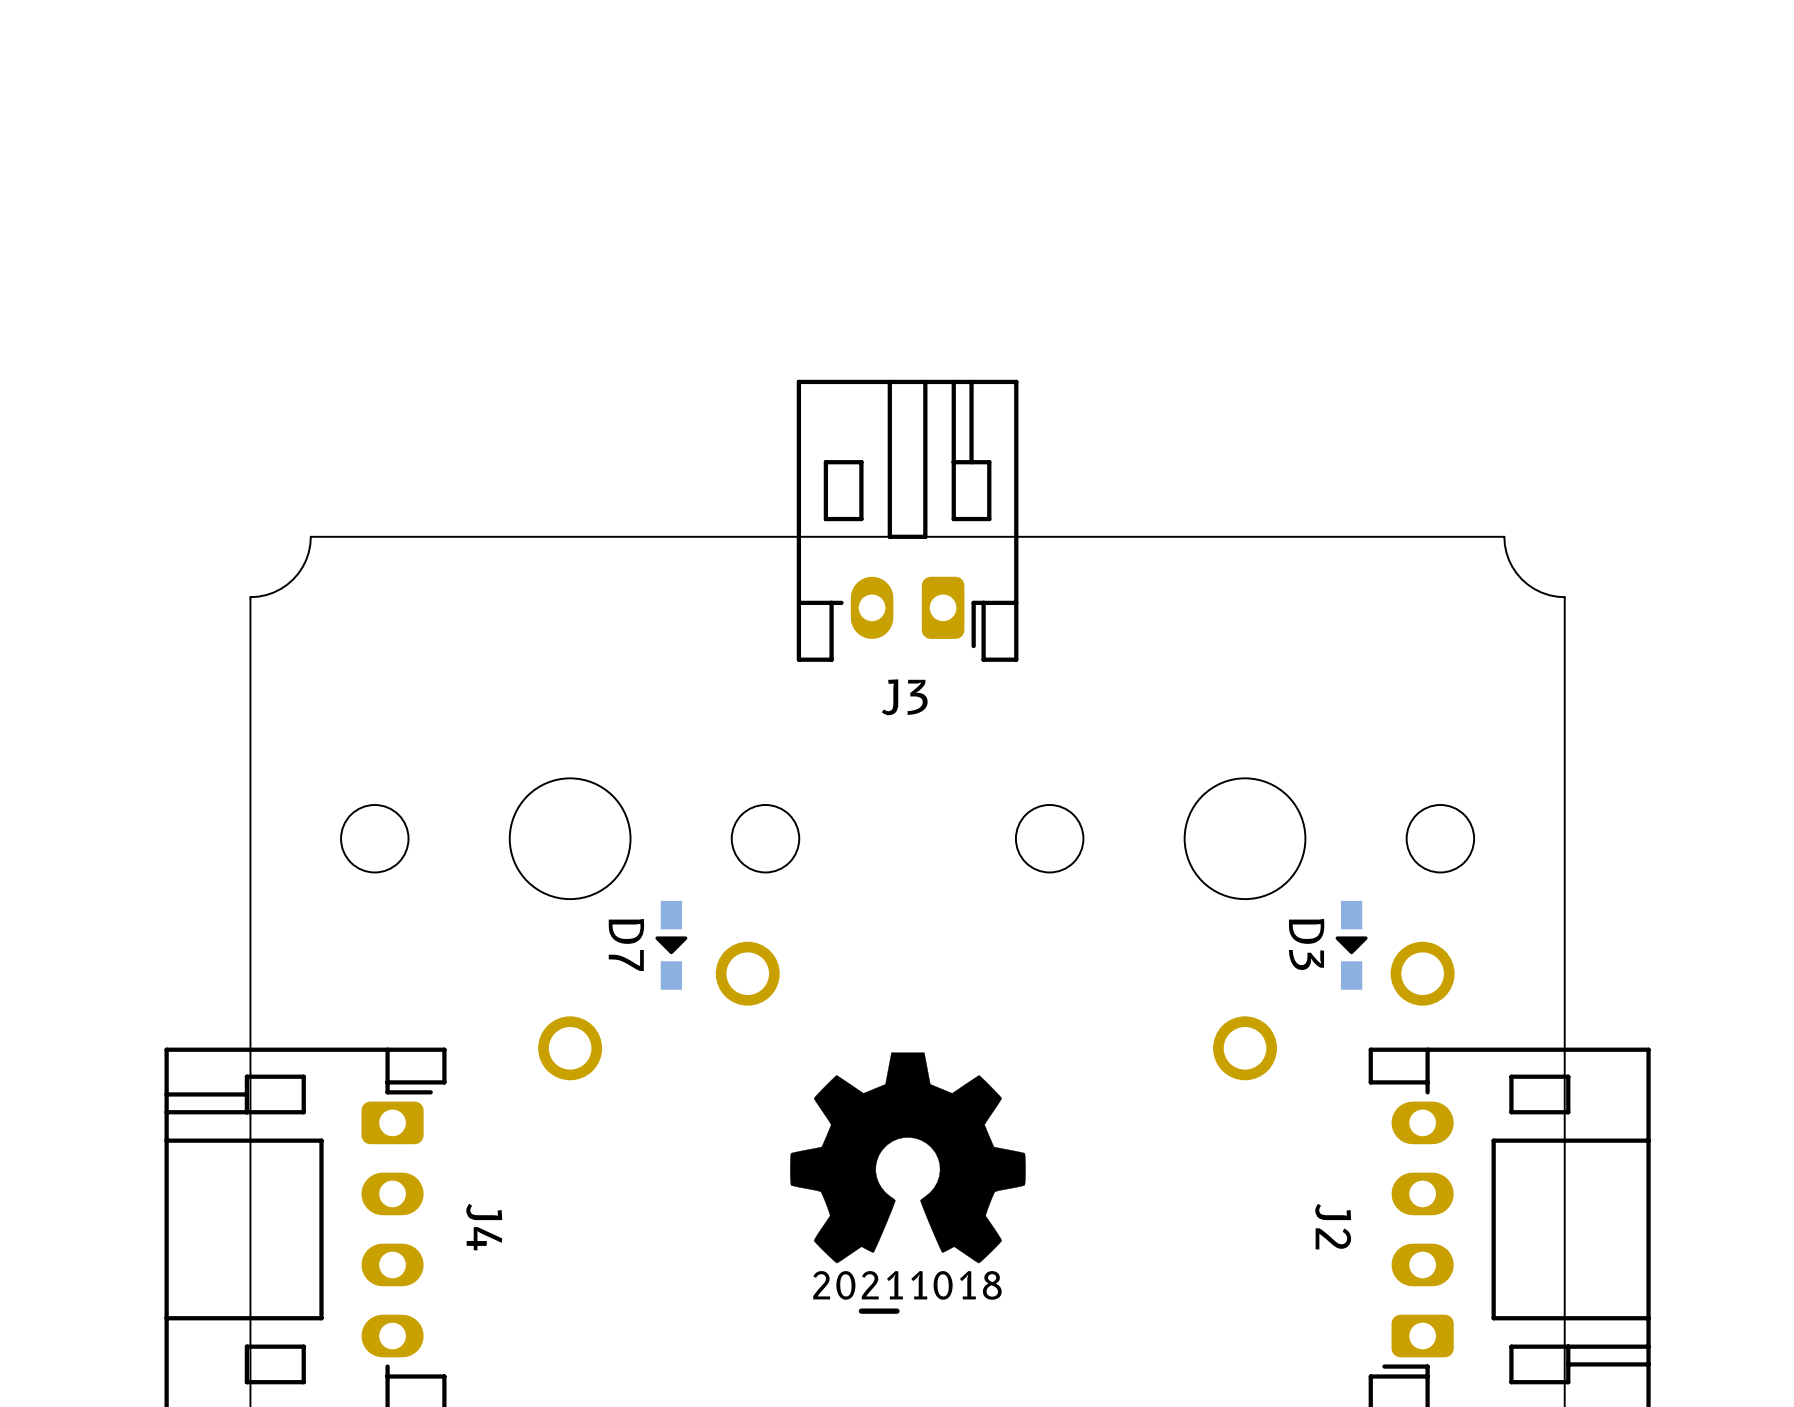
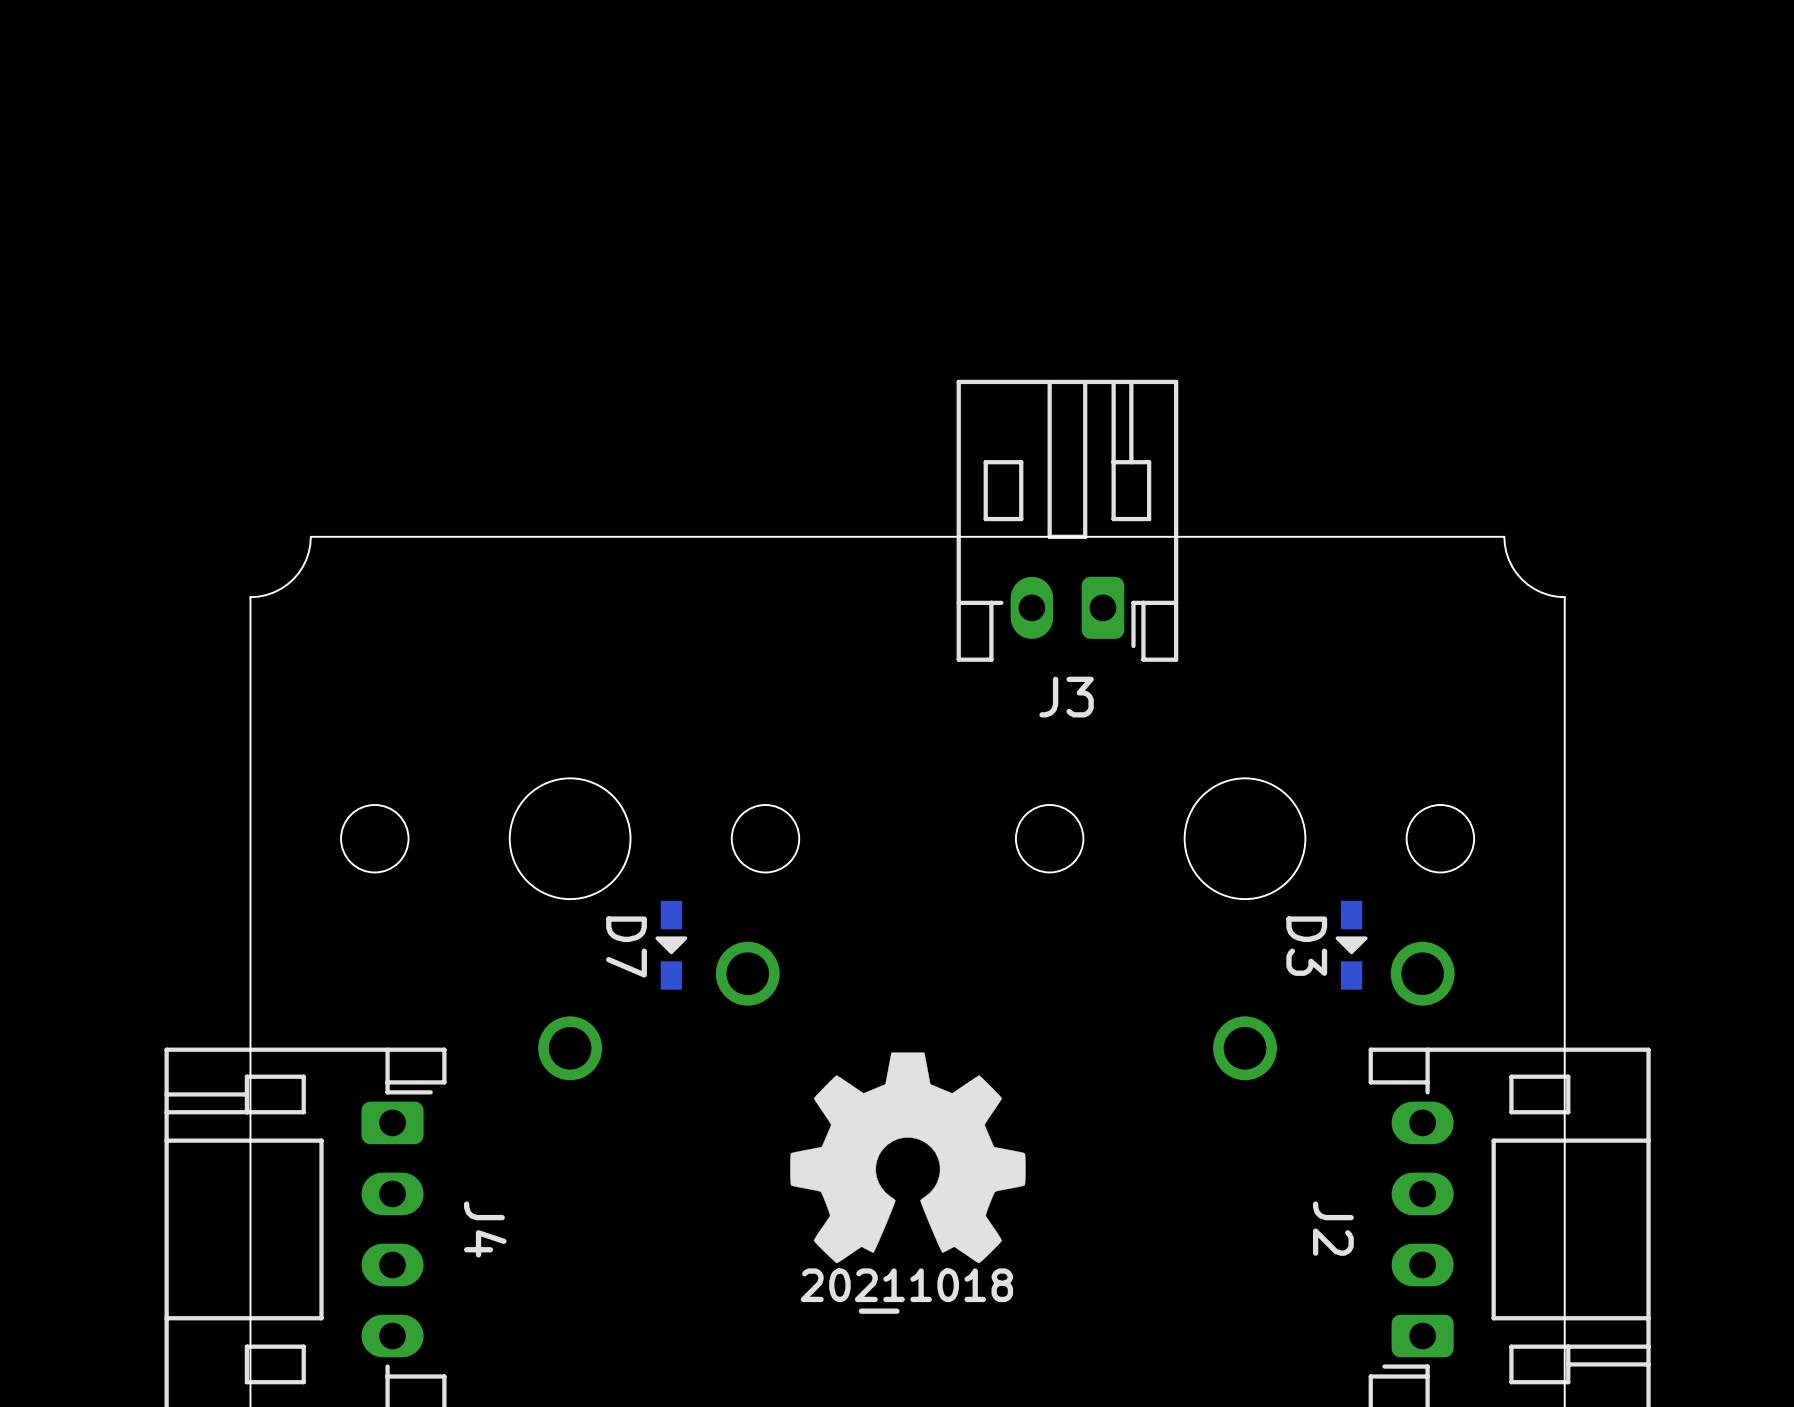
J3 position: (907, 520) -> (1067, 520)

